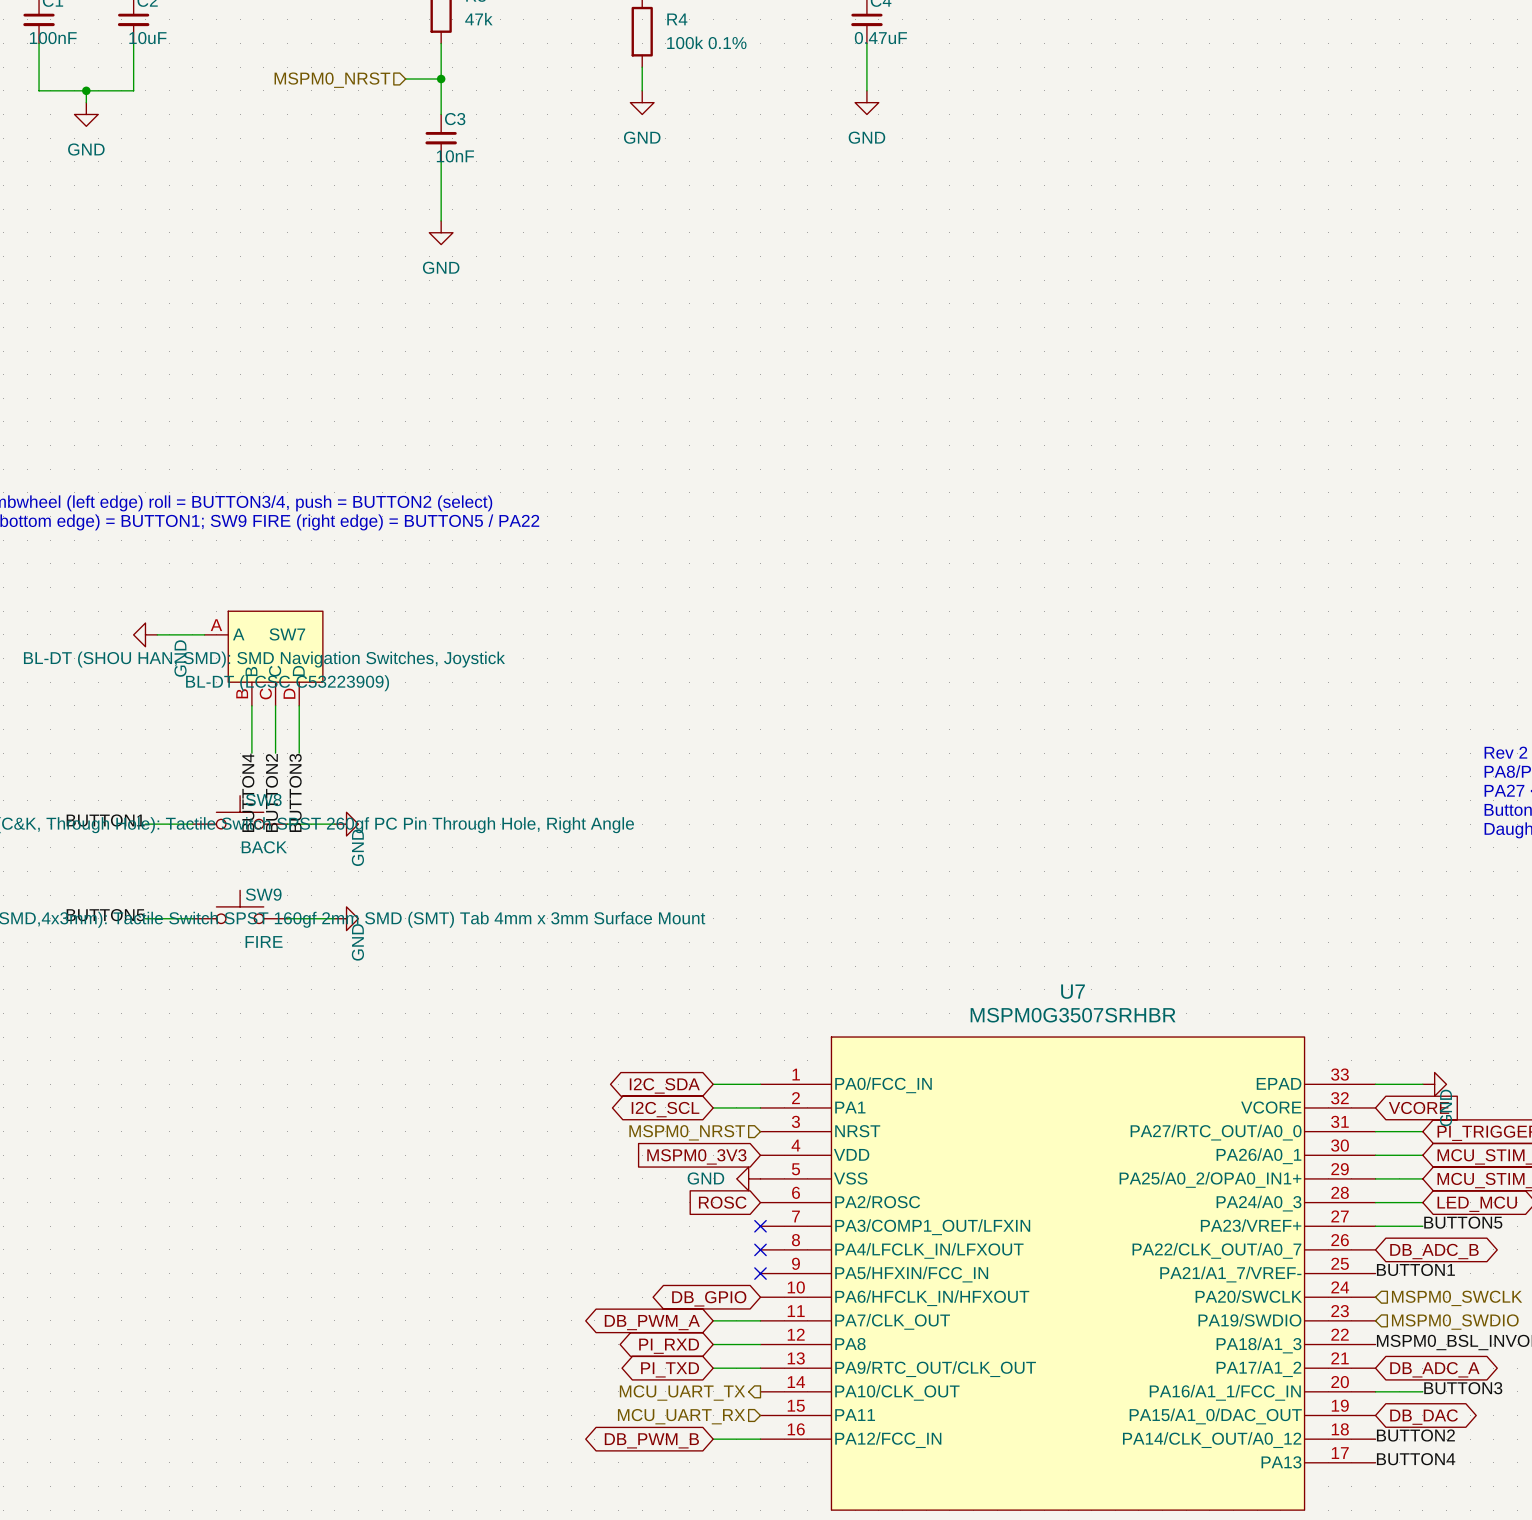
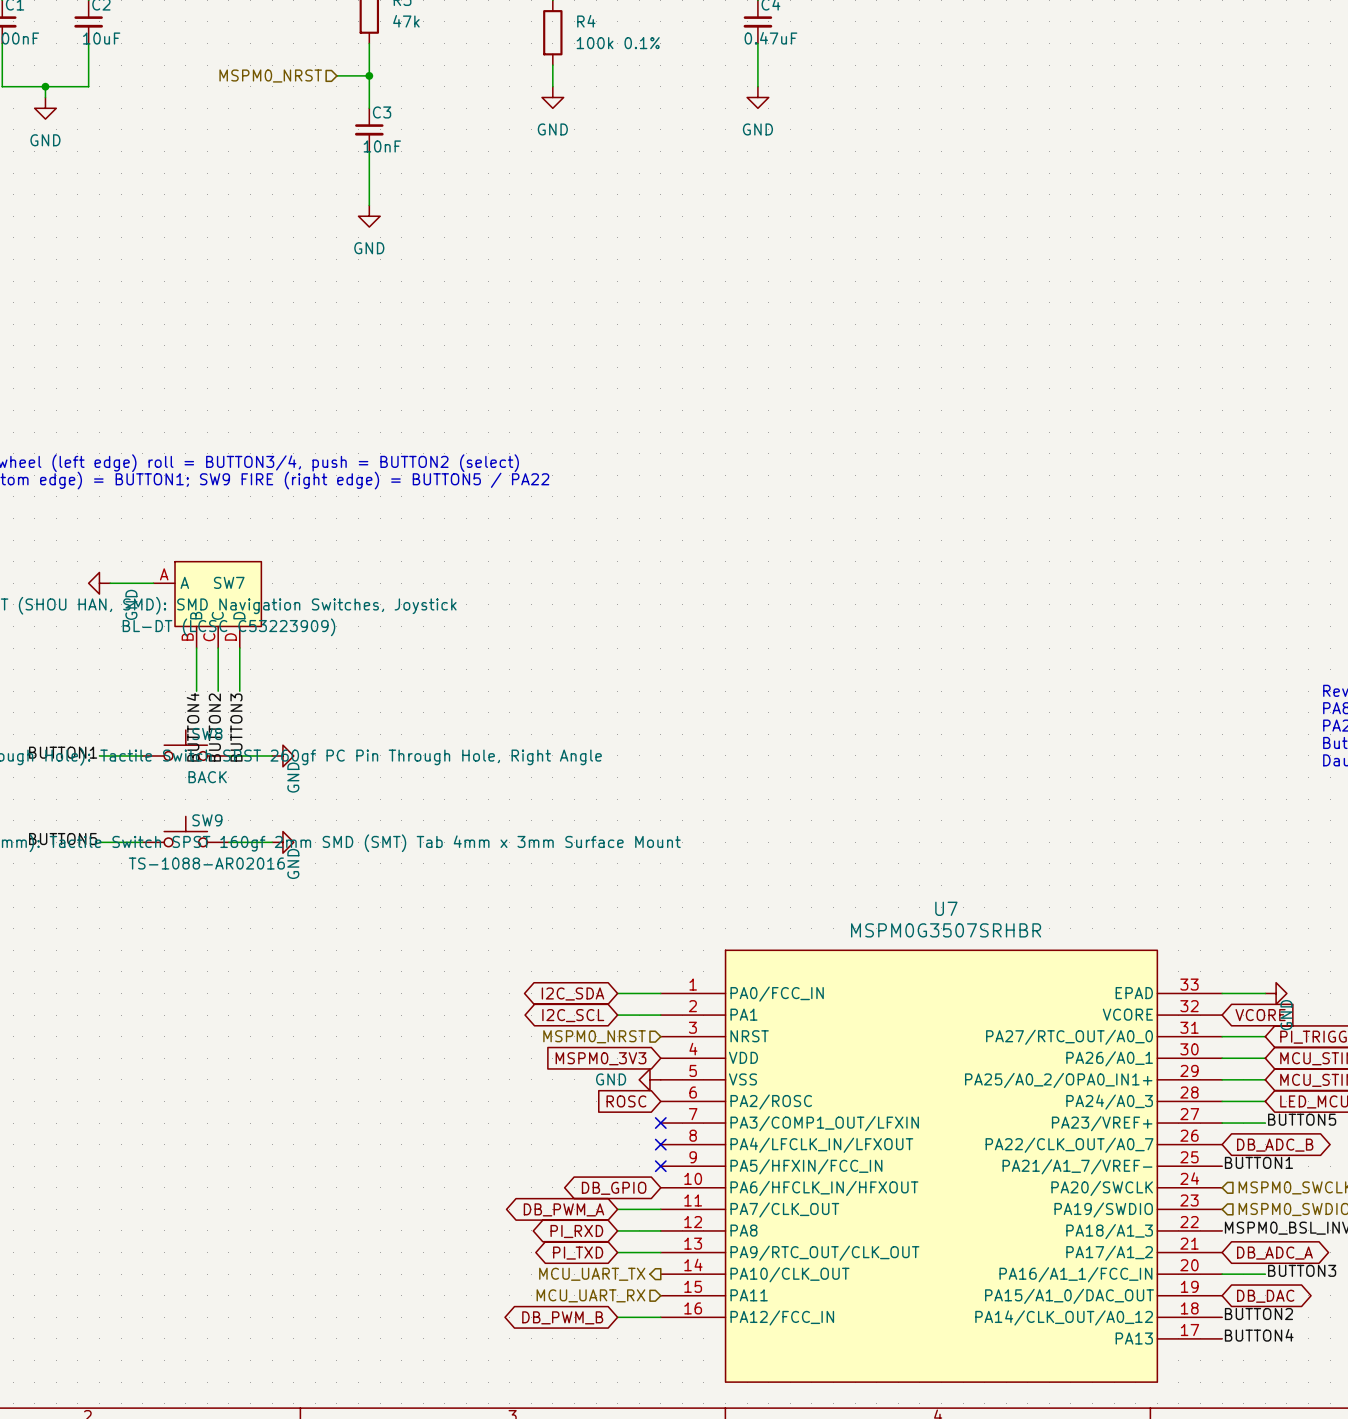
SW9 value: FIRE (264, 941) -> TS-1088-AR02016 (206, 863)

